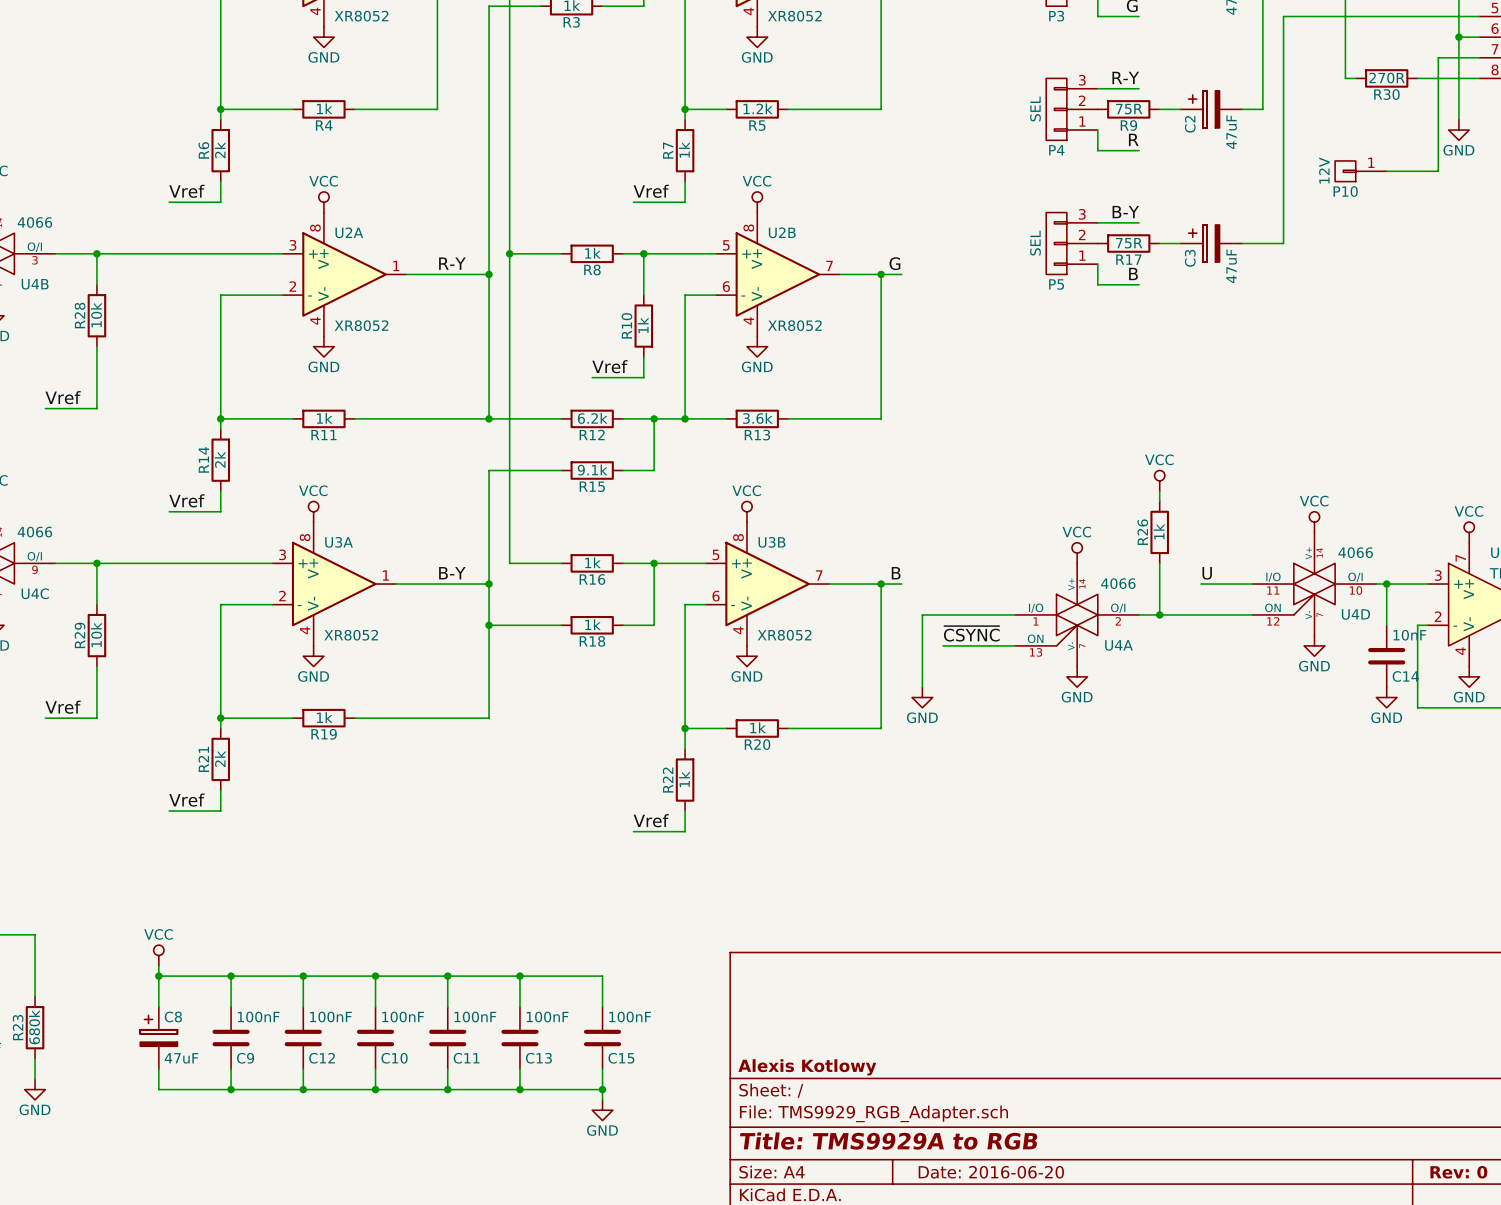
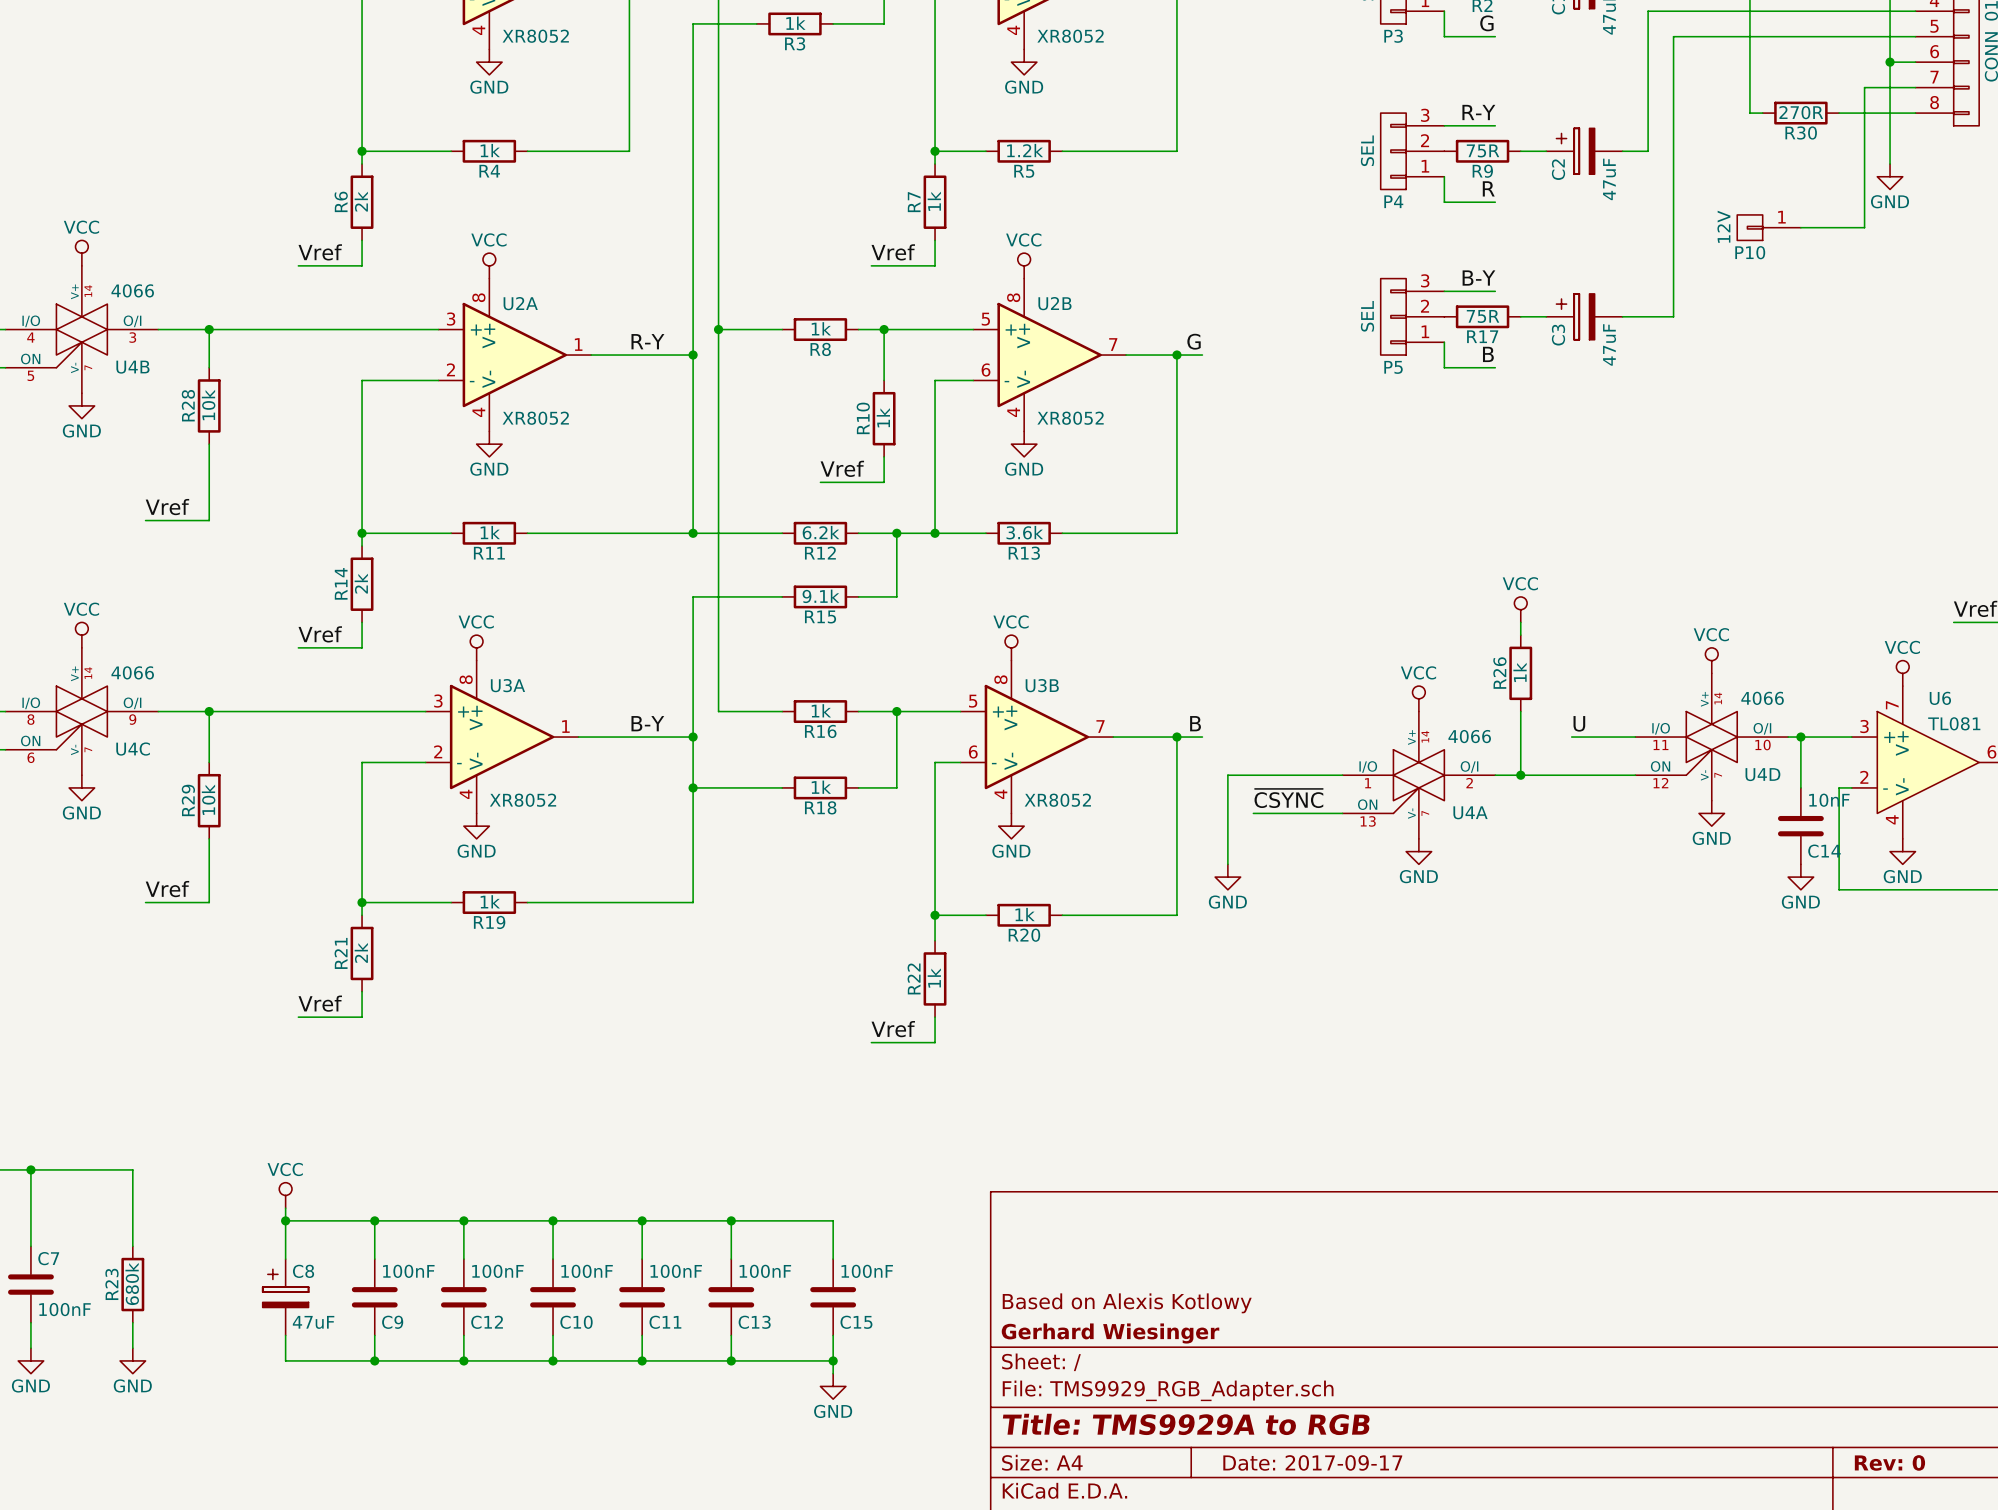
title block: none -> Based on Alexis Kotlowy (1127, 1303)
title block: Alexis Kotlowy (807, 1067) -> Gerhard Wiesinger (1110, 1333)
title block: Date: 2016-06-20 (991, 1172) -> Date: 2017-09-17 (1312, 1462)

